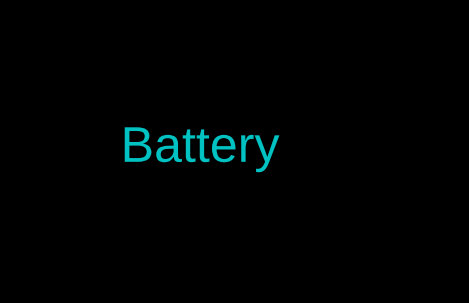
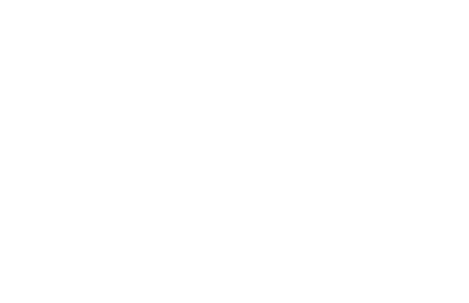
text: Battery (202, 149) -> none

